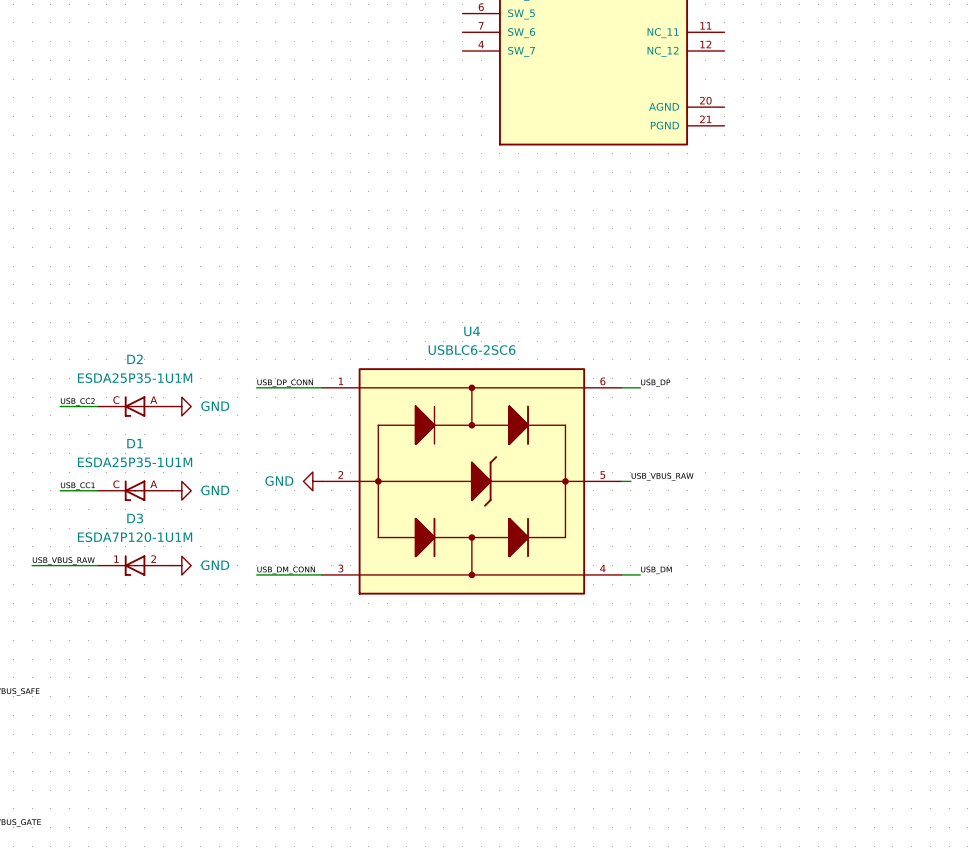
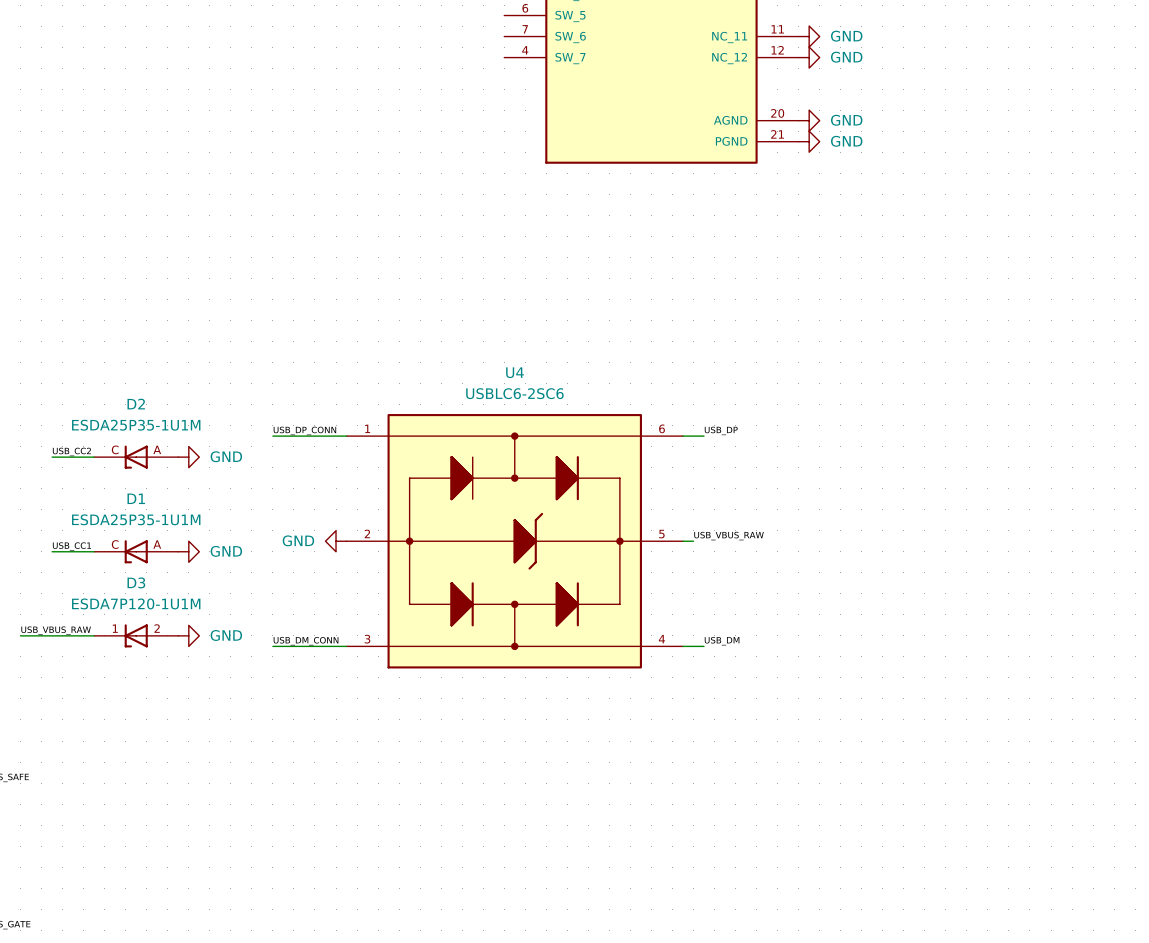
power symbol: none -> GND (809, 36)
power symbol: none -> GND (809, 57)
power symbol: none -> GND (809, 120)
power symbol: none -> GND (809, 141)

